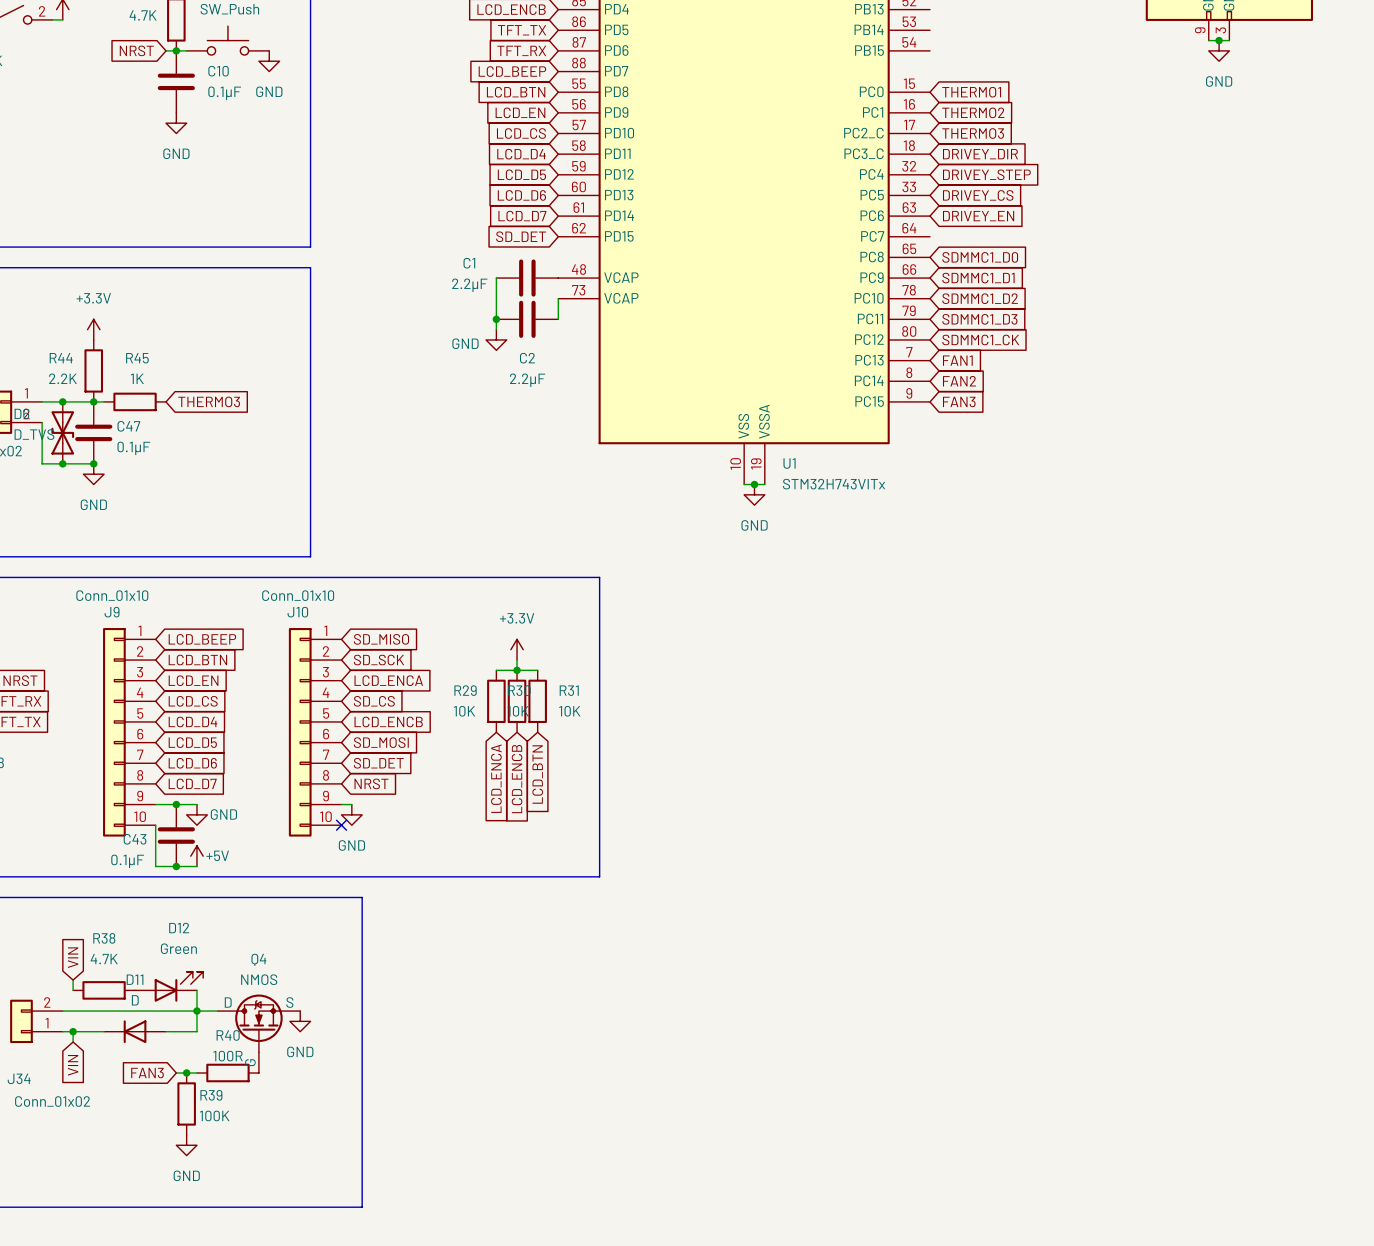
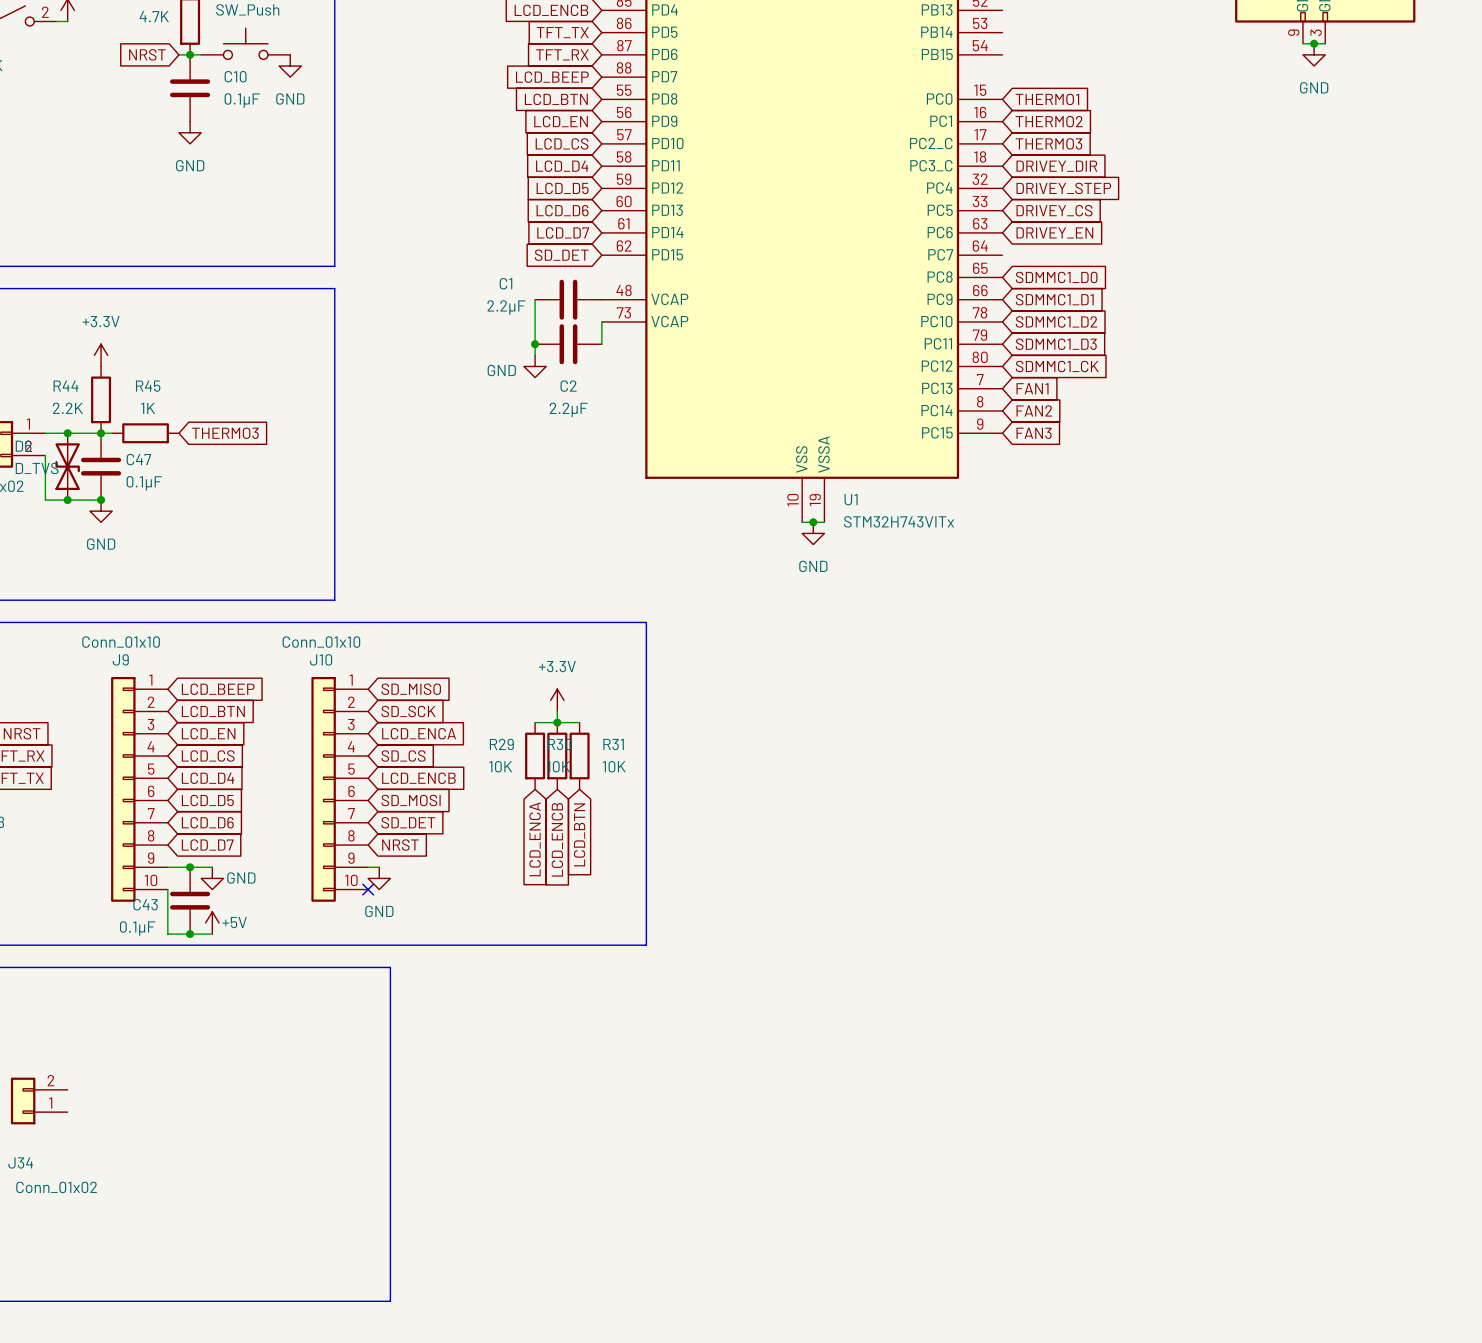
global label: VIN (73, 957) -> none
wire: (73, 980) (73, 990) -> none
D12: Green (169, 986) -> none
R38: 4.7K (104, 990) -> none
wire: (196, 990) (196, 1031) (166, 1031) -> none
wire: (62, 1011) (217, 1011) -> none
junction: (196, 1011) -> none
power symbol: GND (300, 1021) -> none
wire: (62, 1031) (104, 1031) -> none
wire: (73, 1031) (73, 1042) -> none
junction: (73, 1031) -> none
D11: D (135, 1031) -> none
Q4: NMOS (258, 1033) -> none
global label: VIN (73, 1065) -> none
wire: (176, 1072) (196, 1072) -> none
junction: (186, 1072) -> none
R40: 100R (227, 1072) -> none
global label: FAN3 (147, 1073) -> none
R39: 100K (186, 1103) -> none
power symbol: GND (186, 1145) -> none

